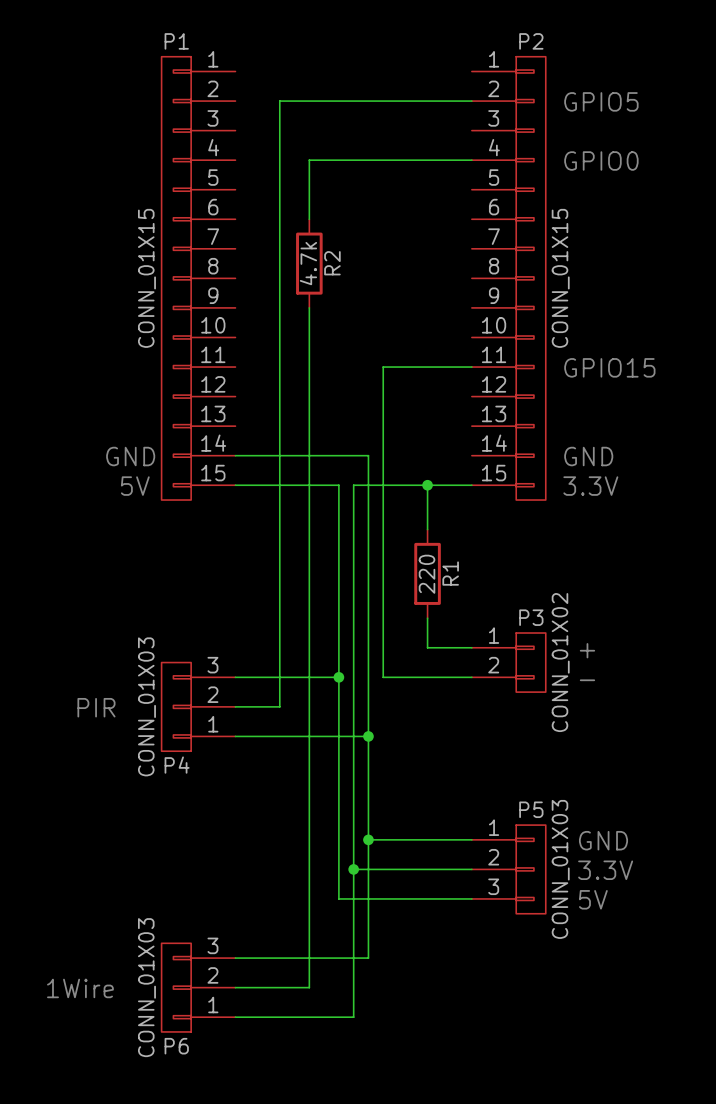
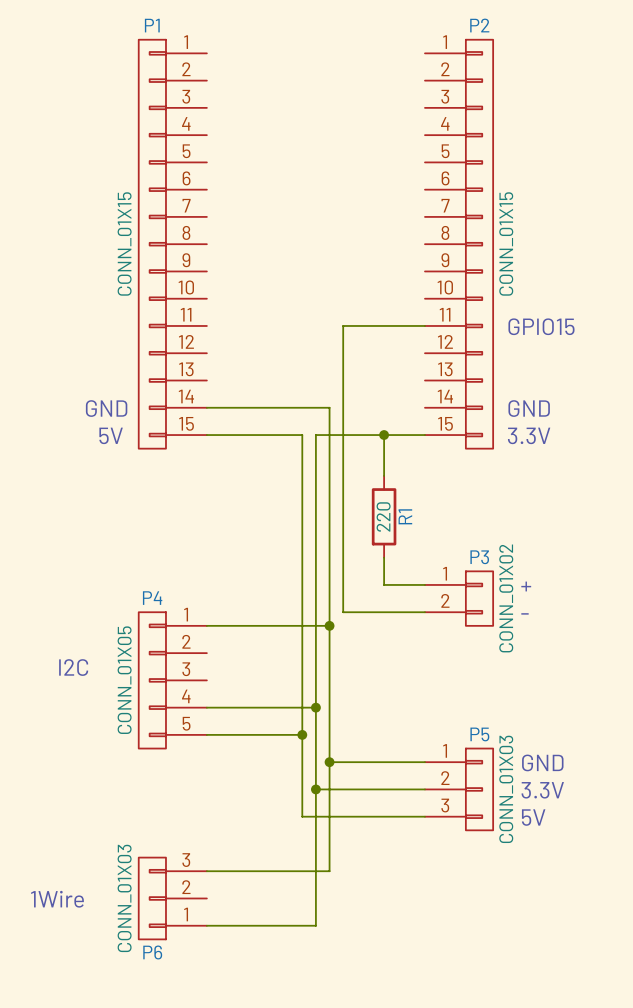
wire: (471, 101) (279, 101) (279, 706) (235, 706) -> none
text: GPIO5 (601, 101) -> none
wire: (471, 160) (309, 160) (309, 219) -> none
text: GPIO0 (601, 161) -> none
R2: 4.7k (309, 263) -> none
wire: (309, 307) (309, 987) (235, 987) -> none
P4 symbol: [161, 662, 236, 752] -> [138, 612, 207, 749]
wire: (235, 677) (338, 677) -> (206, 734) (302, 734)
junction: (338, 677) -> none
junction: none -> (329, 625)
P4 value: CONN_01X03 (146, 706) -> CONN_01X05 (124, 680)
text: PIR (96, 707) -> none
wire: (235, 736) (368, 736) -> (206, 625) (329, 625)
junction: (368, 736) -> none
text: none -> I2C (73, 667)
P4 name position: P4 (177, 765) -> P4 (152, 598)
wire: none -> (206, 707) (315, 707)
junction: none -> (315, 707)
junction: none -> (302, 734)

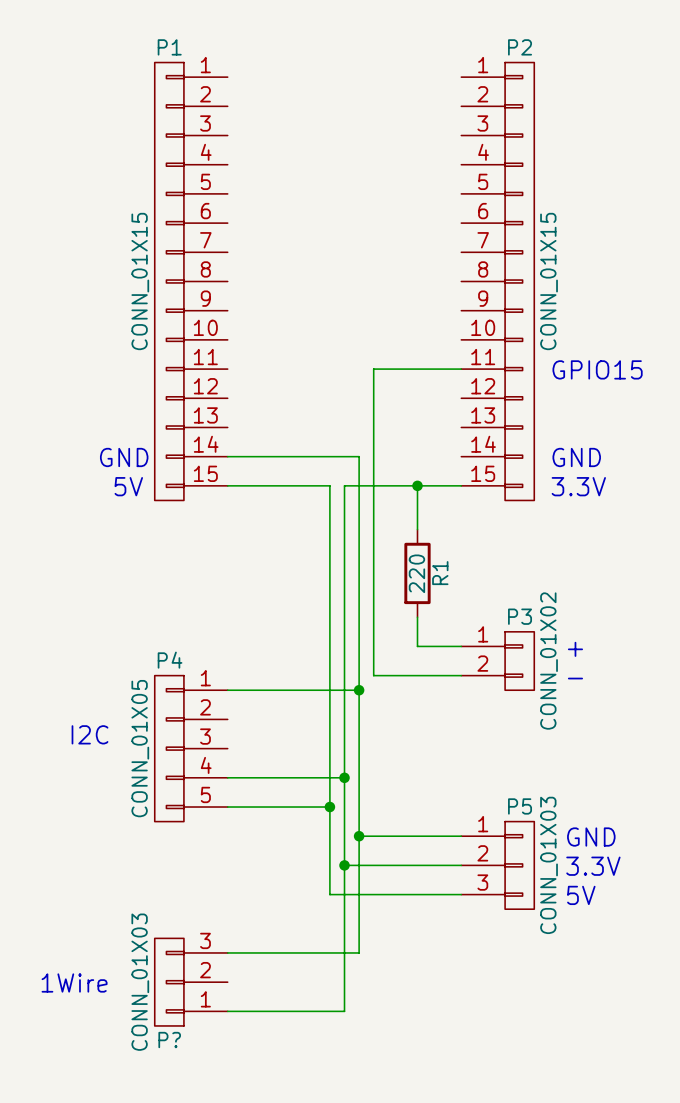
P6 name: P6 (152, 952) -> P? (169, 1040)

